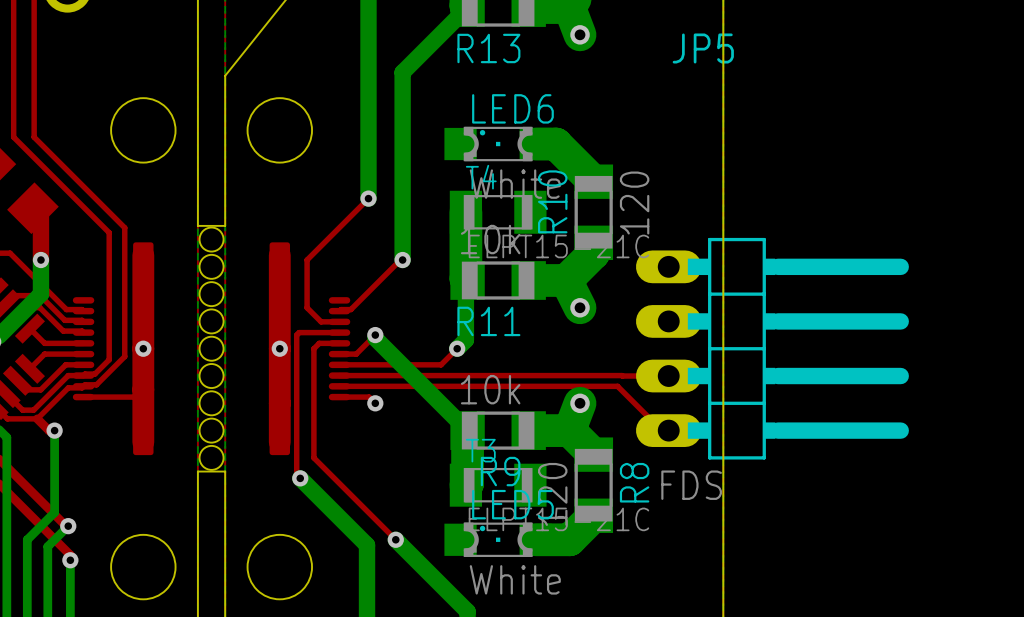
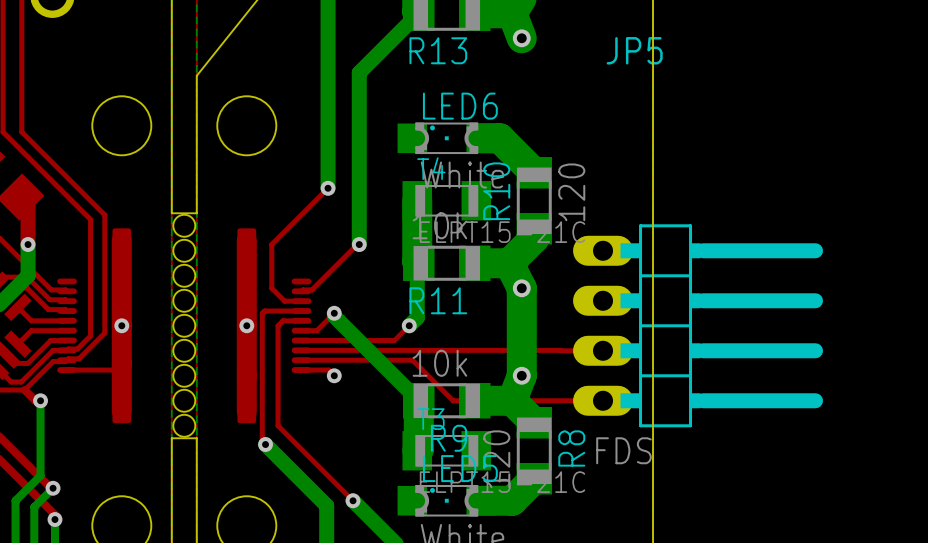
bottom track: none -> (521, 288) (521, 375)
top track: (460, 386) (617, 386) (661, 430) -> (412, 360) (453, 400) (596, 400)

